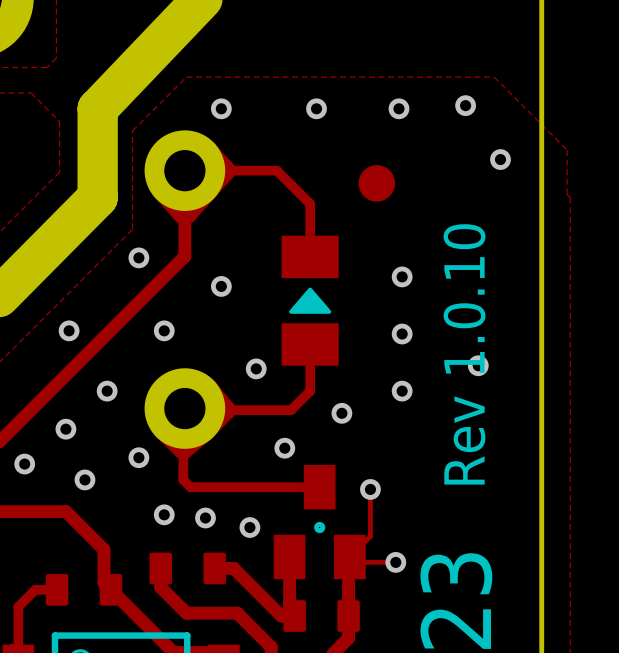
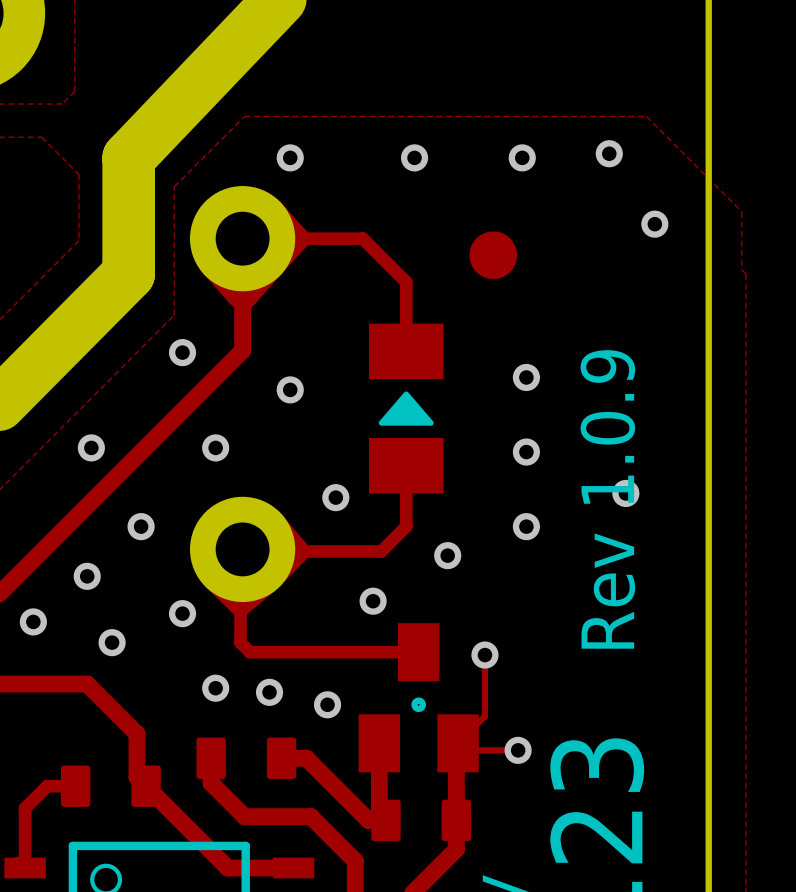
text: Rev 1.0.10 (464, 354) -> Rev 1.0.9 (607, 499)

